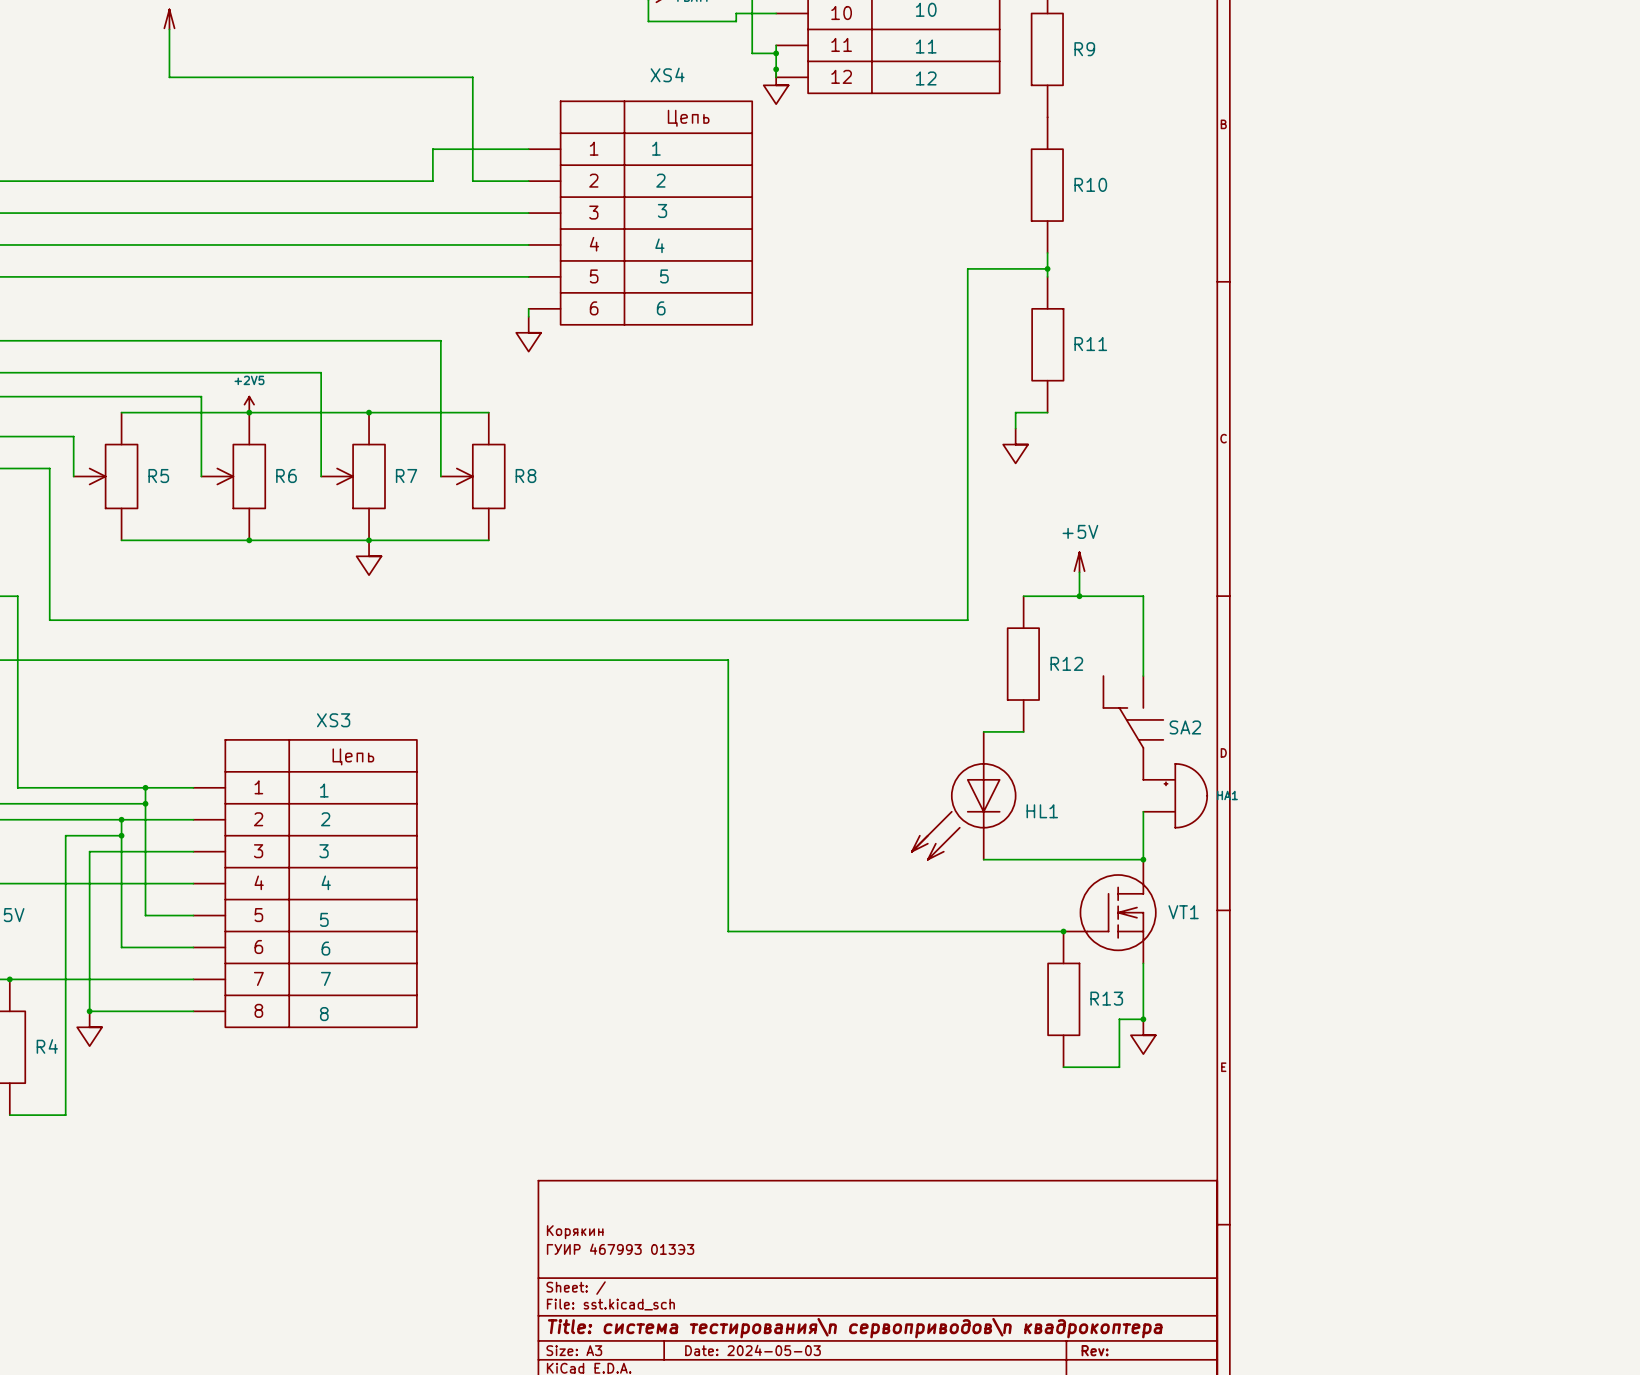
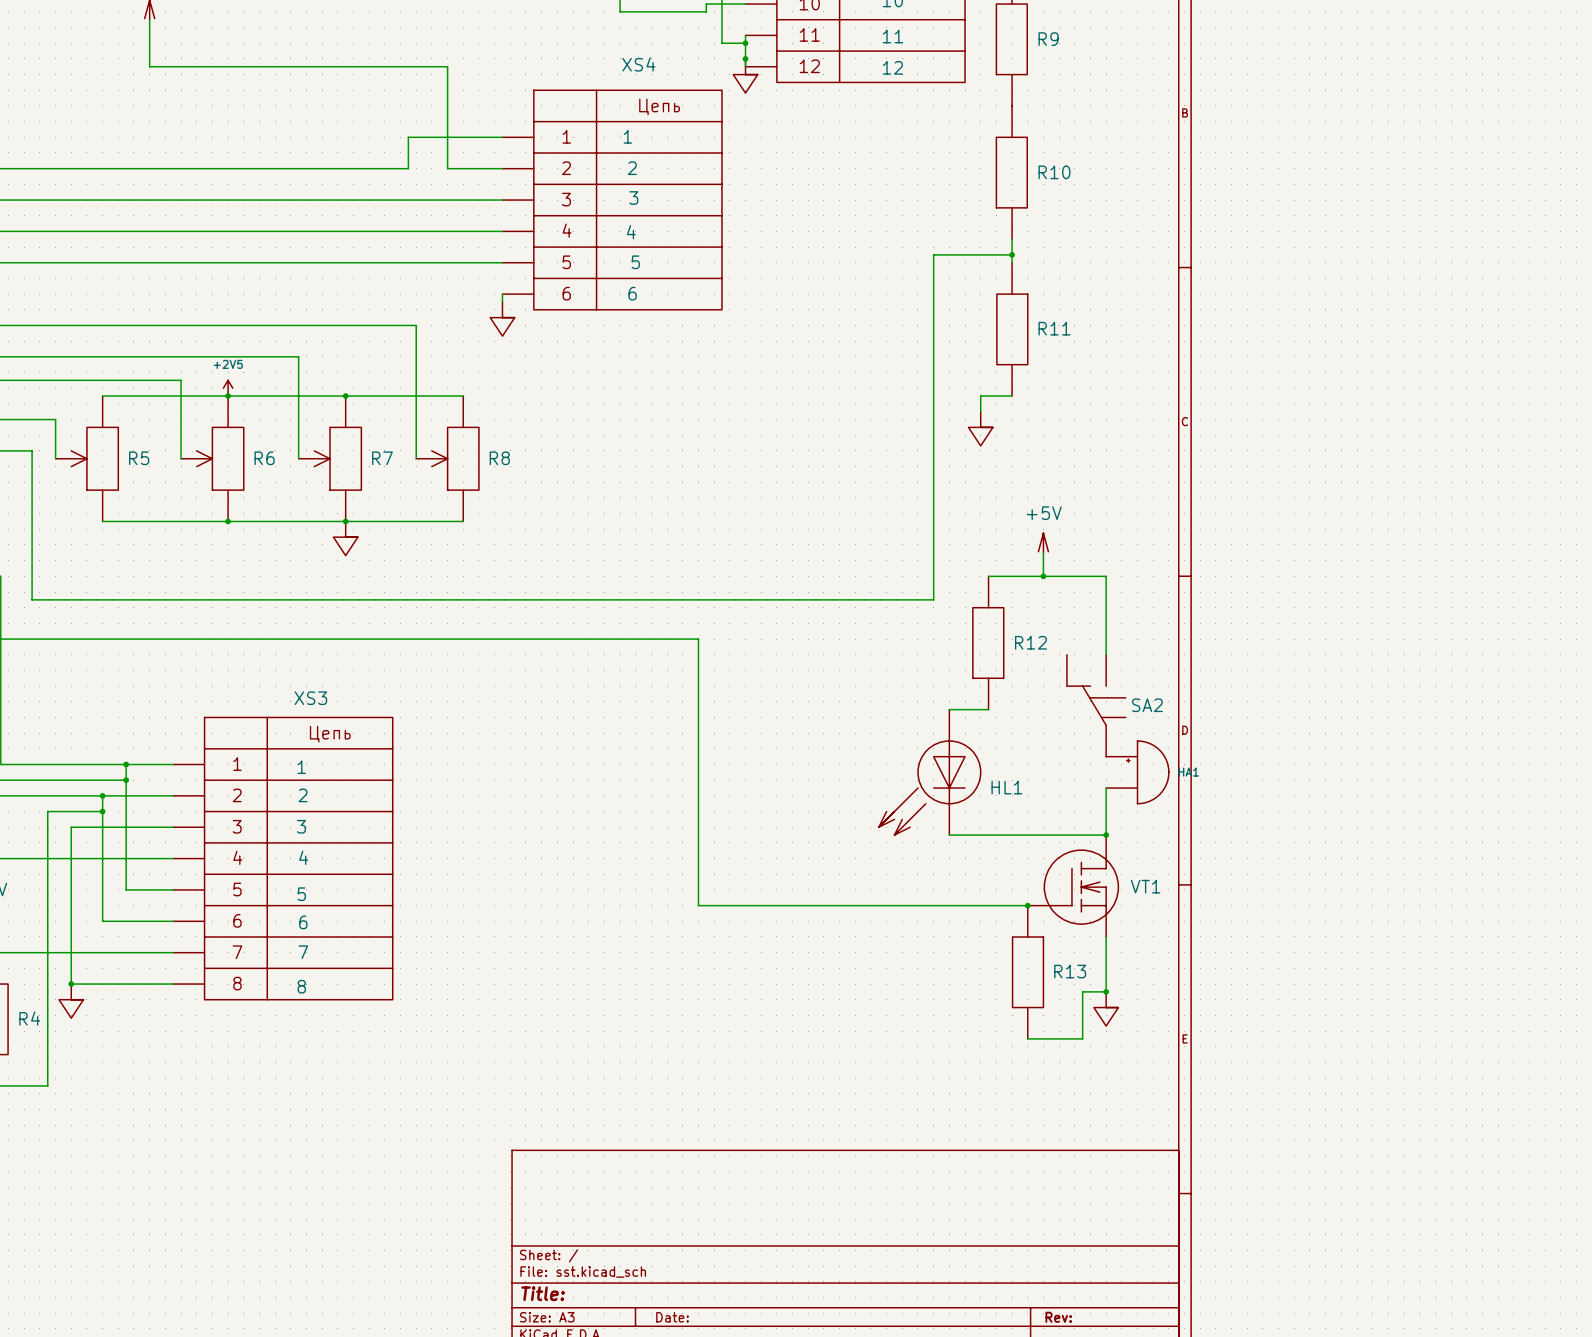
title block: Корякин (575, 1232) -> none
title block: ГУИР 467993 013Э3 (620, 1249) -> none
title block: Title: система тестирования\n сервоприводов\n квадрокоптера (855, 1328) -> Title: (543, 1293)
title block: Date: 2024-05-03 (753, 1350) -> Date: (672, 1317)

